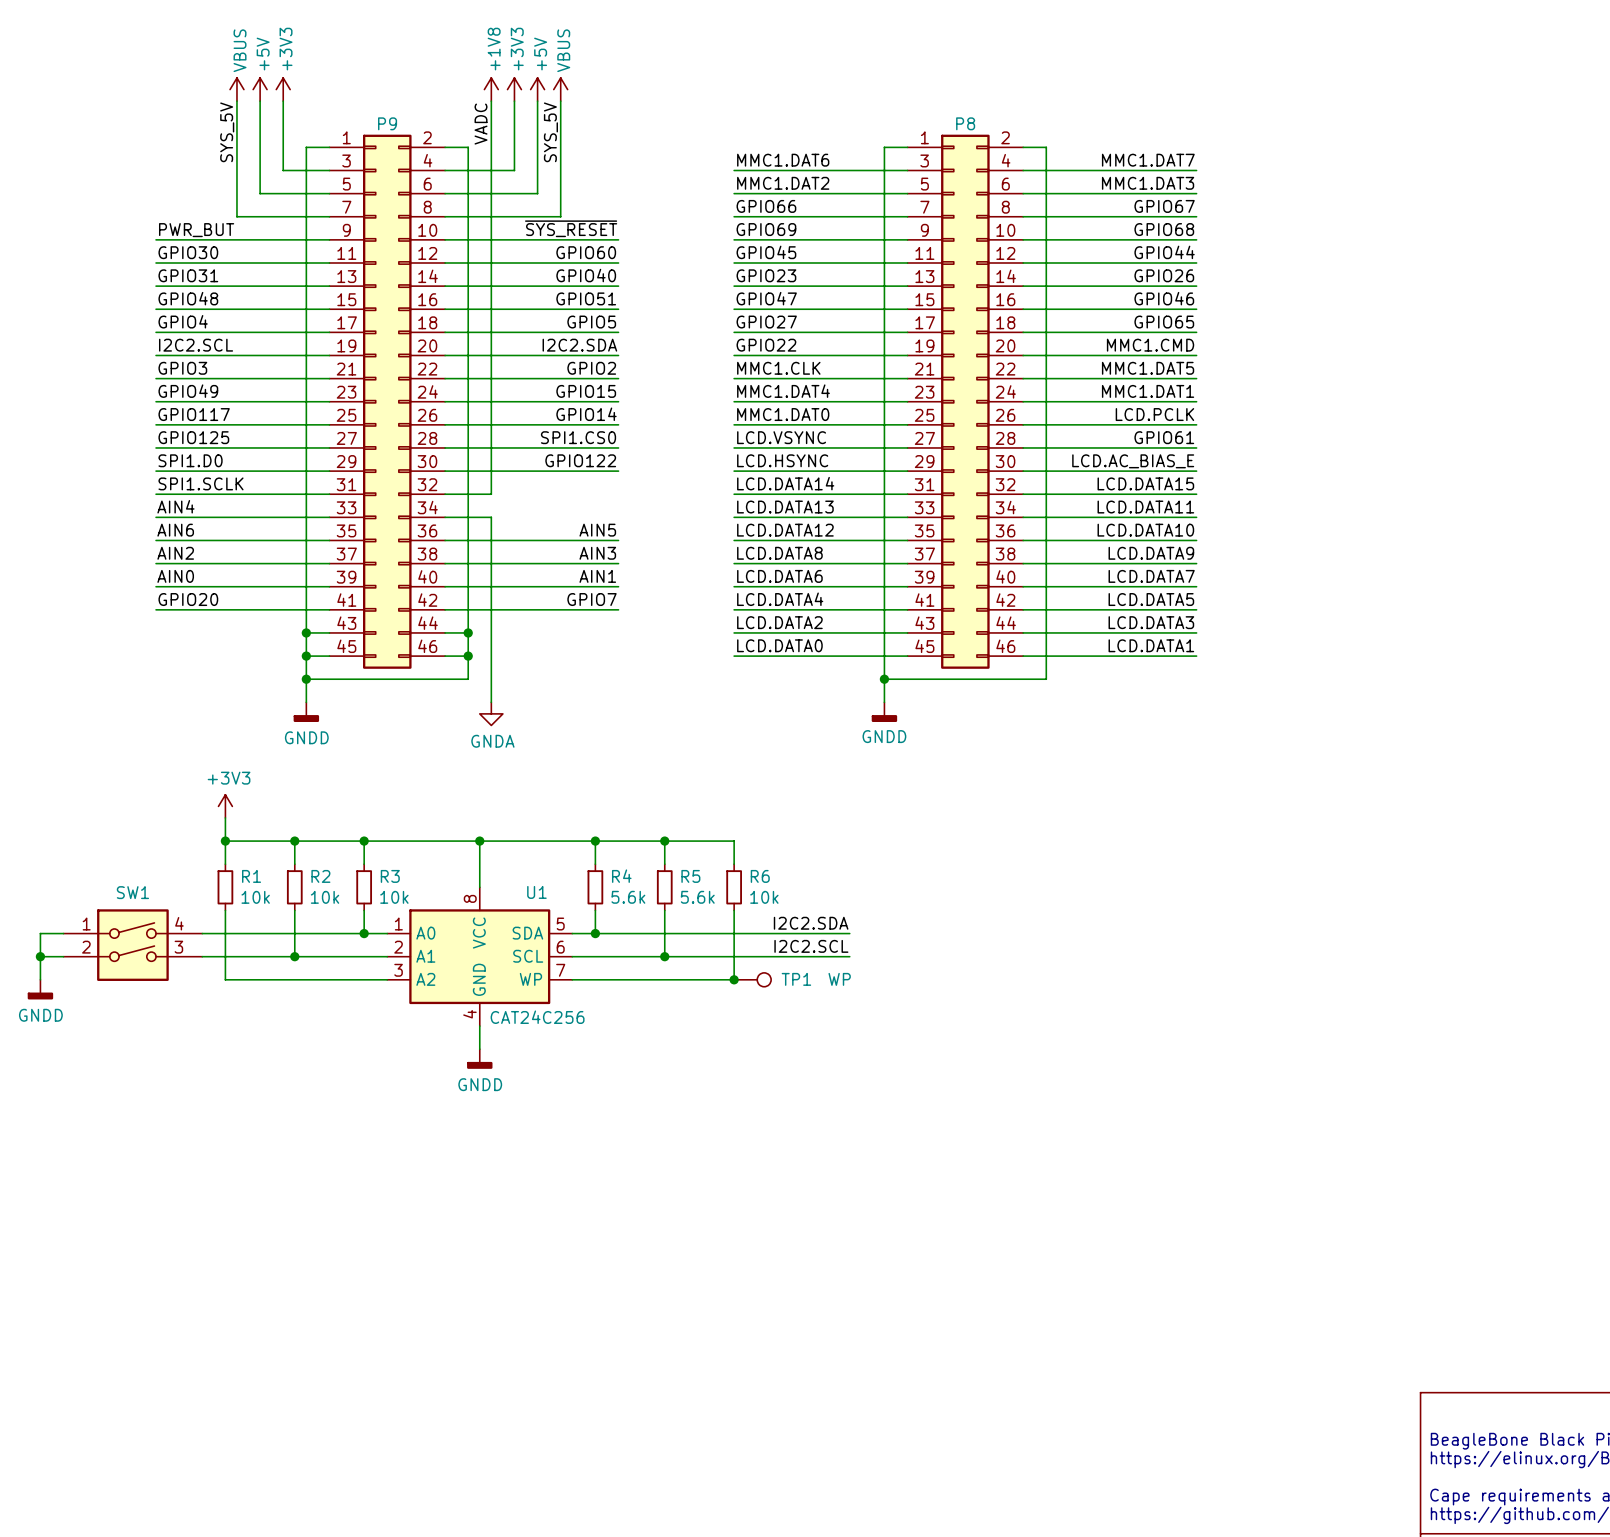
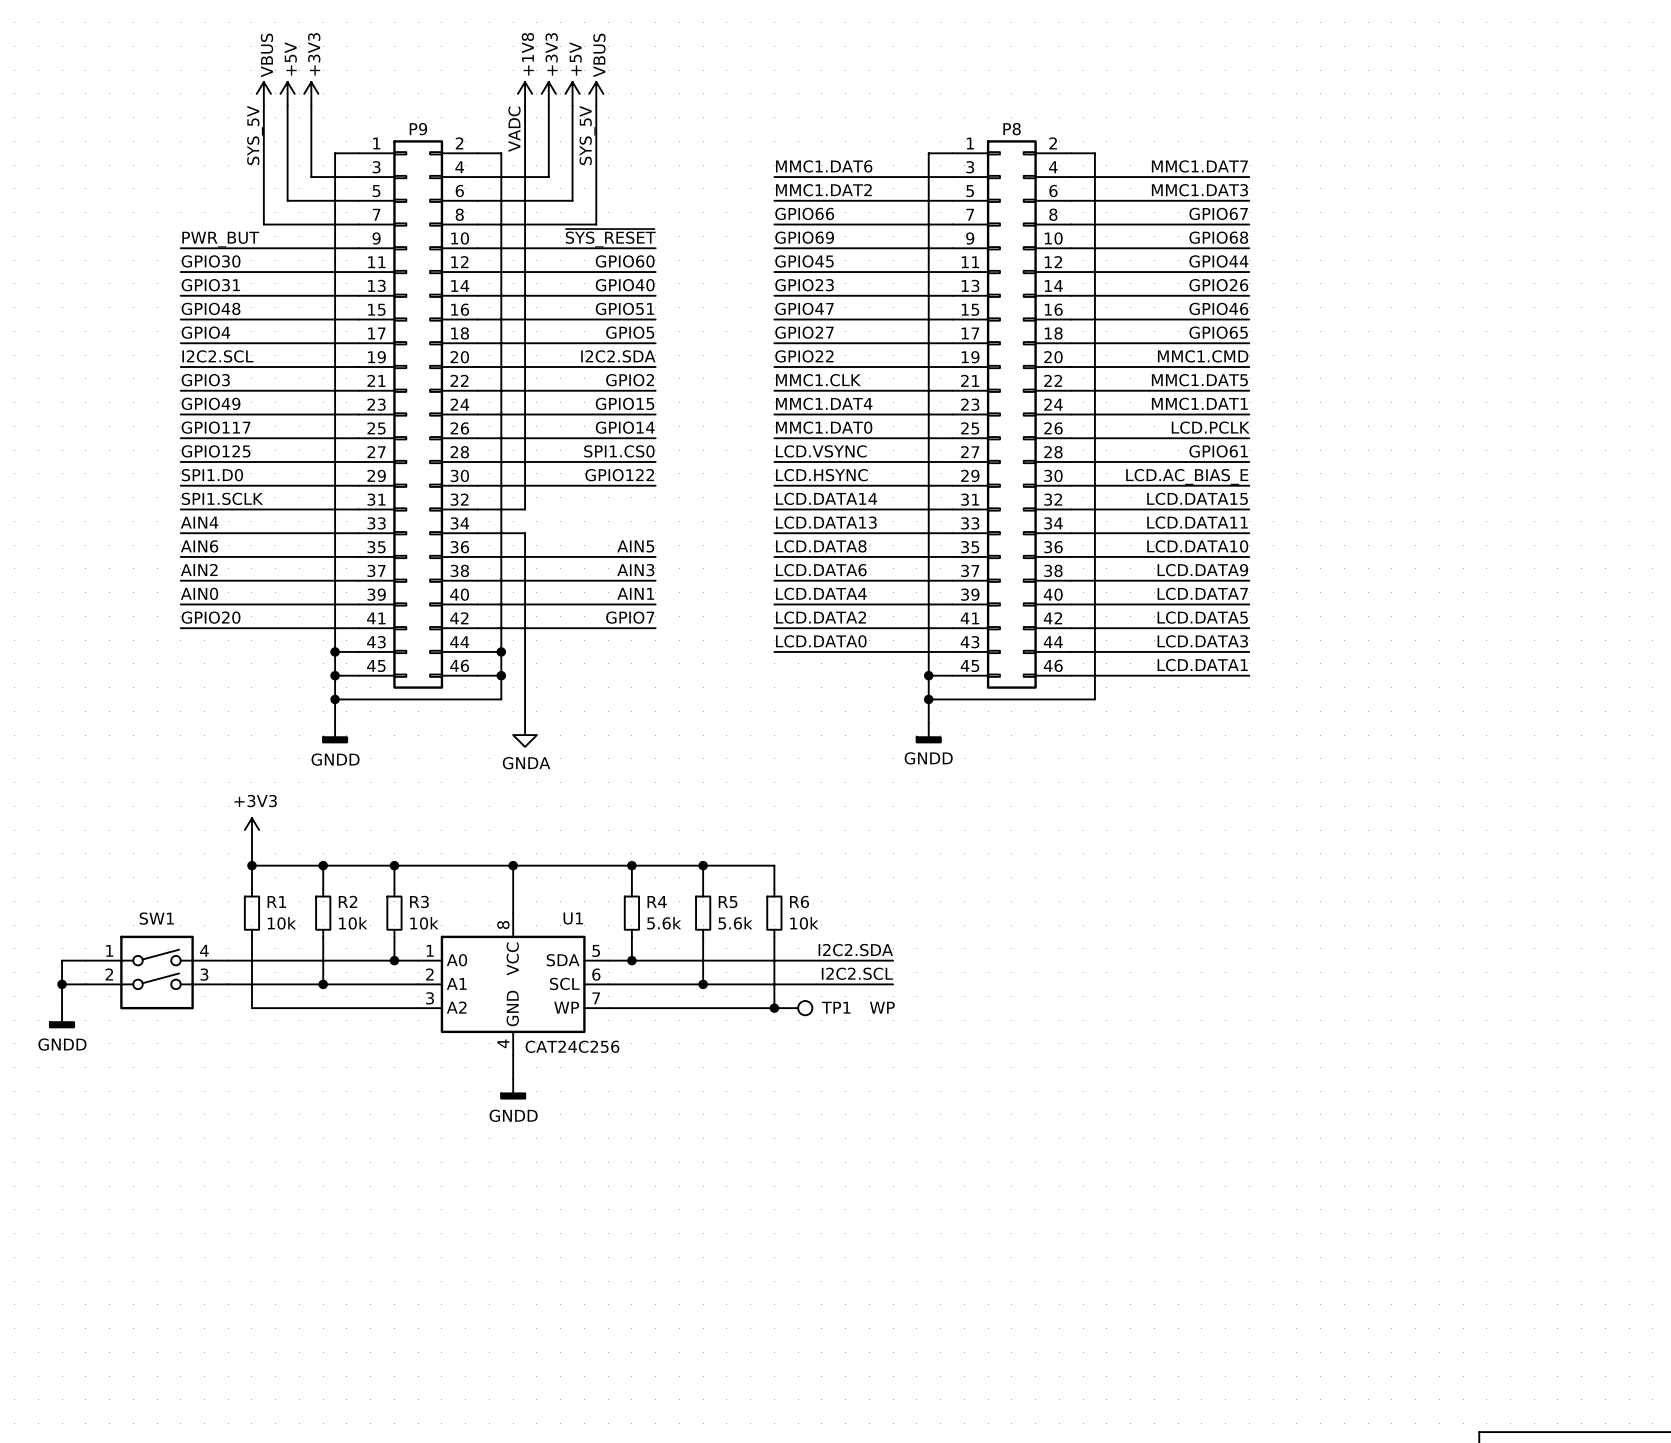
label: LCD.DATA12 (785, 530) -> LCD.DATA8 (821, 546)
label: LCD.DATA8 (779, 553) -> LCD.DATA6 (821, 570)
label: LCD.DATA6 (779, 576) -> LCD.DATA4 (821, 593)
label: LCD.DATA4 (780, 599) -> LCD.DATA2 (821, 617)
label: LCD.DATA2 (779, 622) -> LCD.DATA0 (821, 641)
label: LCD.DATA0 (779, 645) -> none
wire: (734, 656) (884, 656) -> none
junction: none -> (928, 675)

